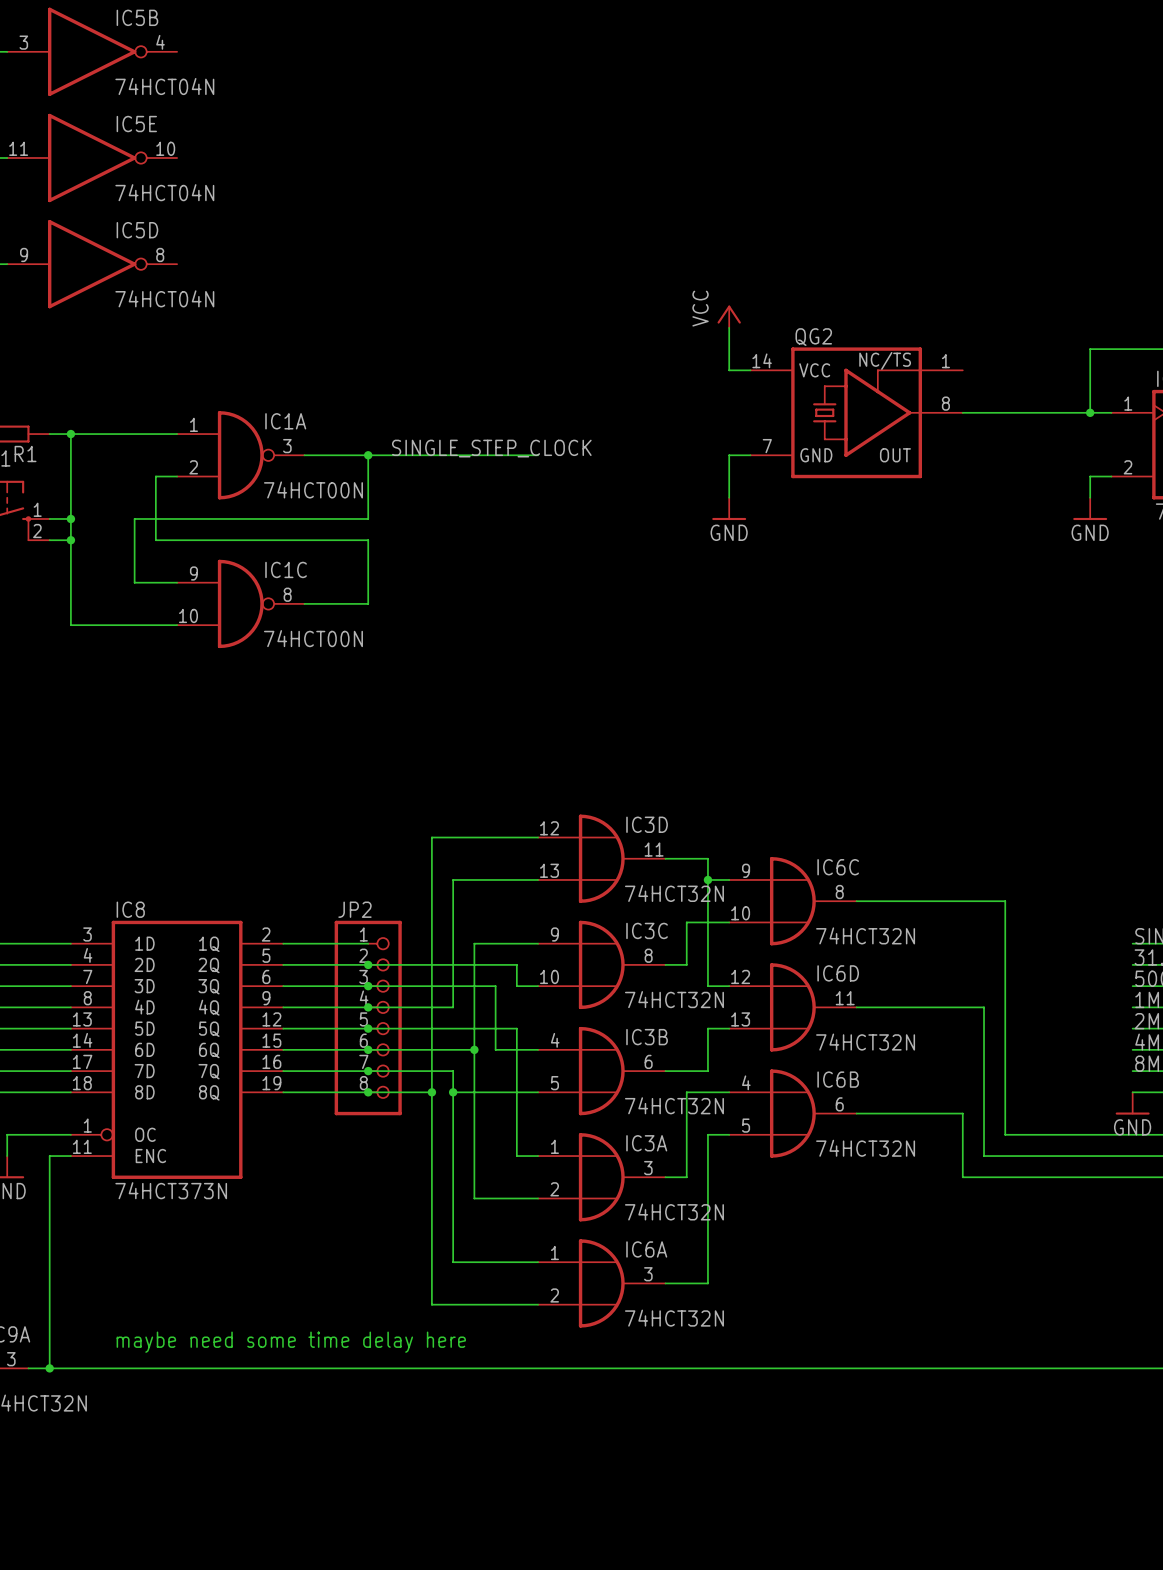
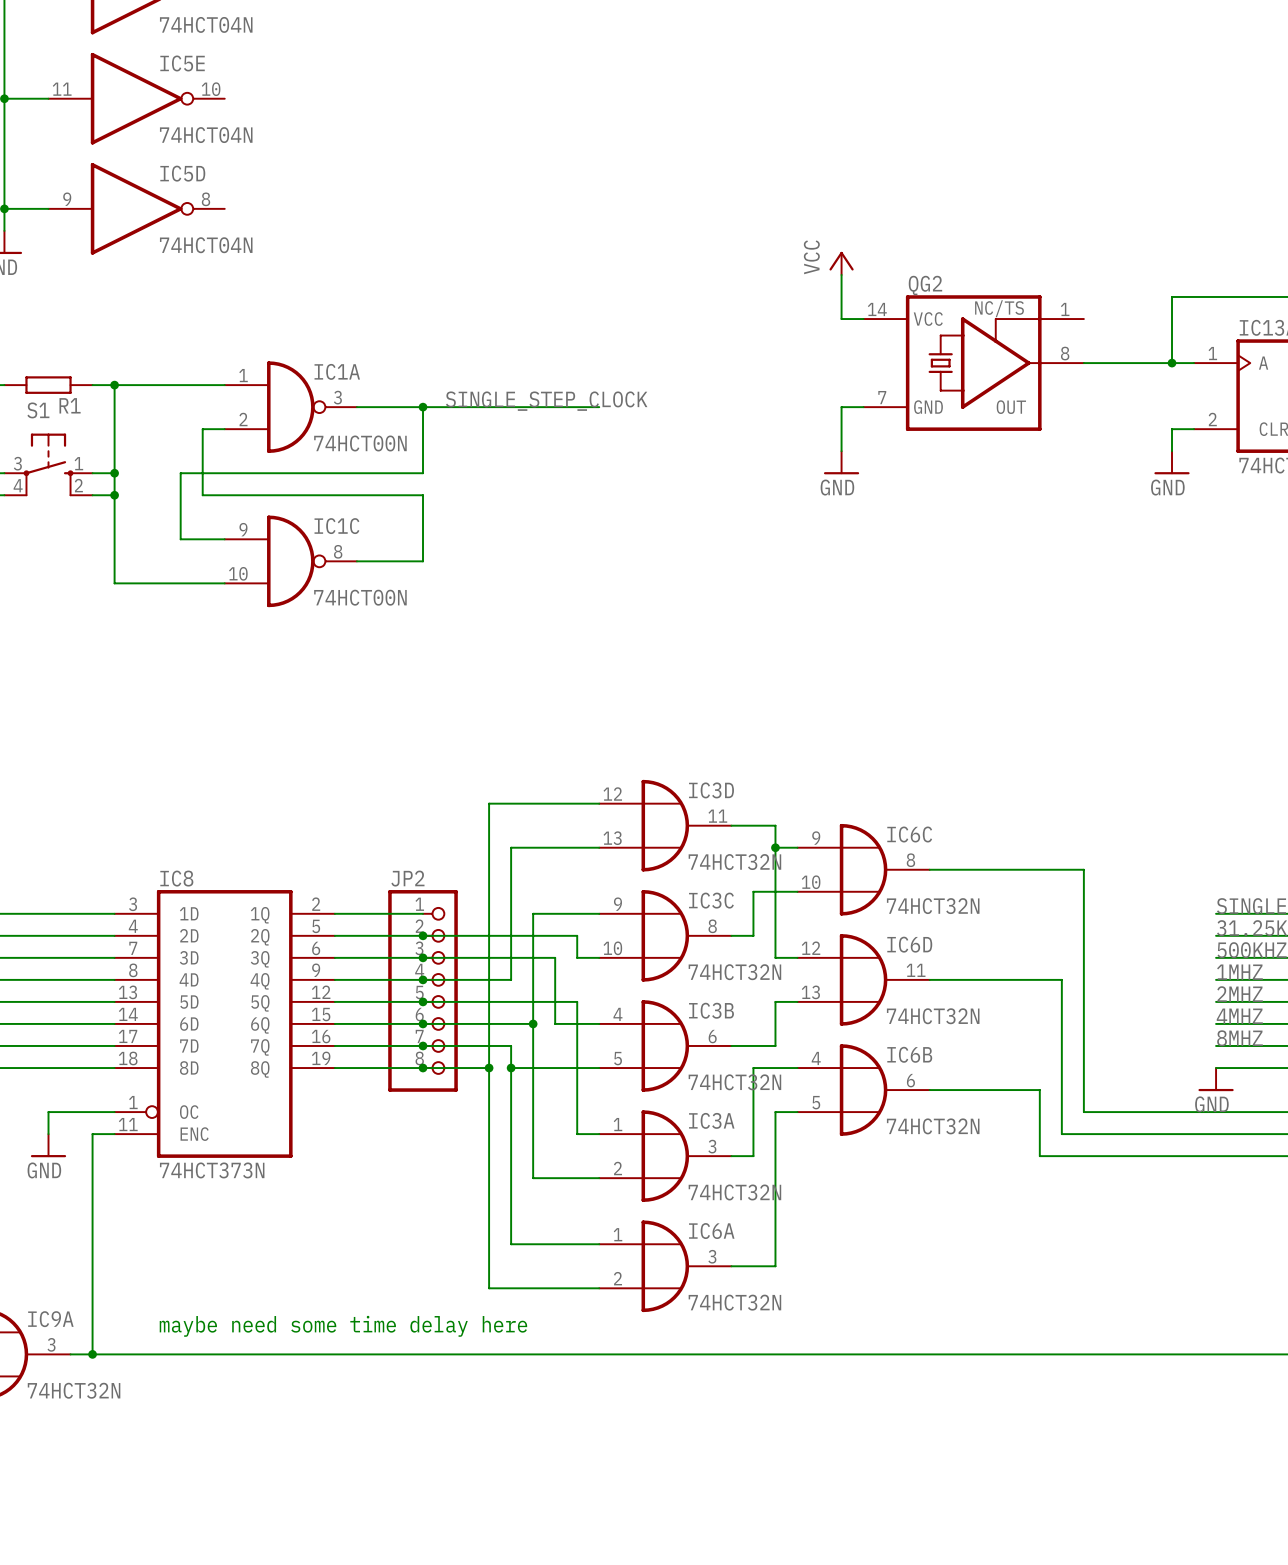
power symbol position: VCC (729, 316) -> VCC (841, 263)
wire: (729, 327) (729, 370) (750, 370) -> (841, 274) (841, 319) (863, 319)
QG2 position: (856, 412) -> (973, 363)
wire: (750, 455) (729, 455) (729, 497) -> (863, 407) (841, 407) (841, 451)
power symbol position: GND (729, 508) -> GND (841, 462)

